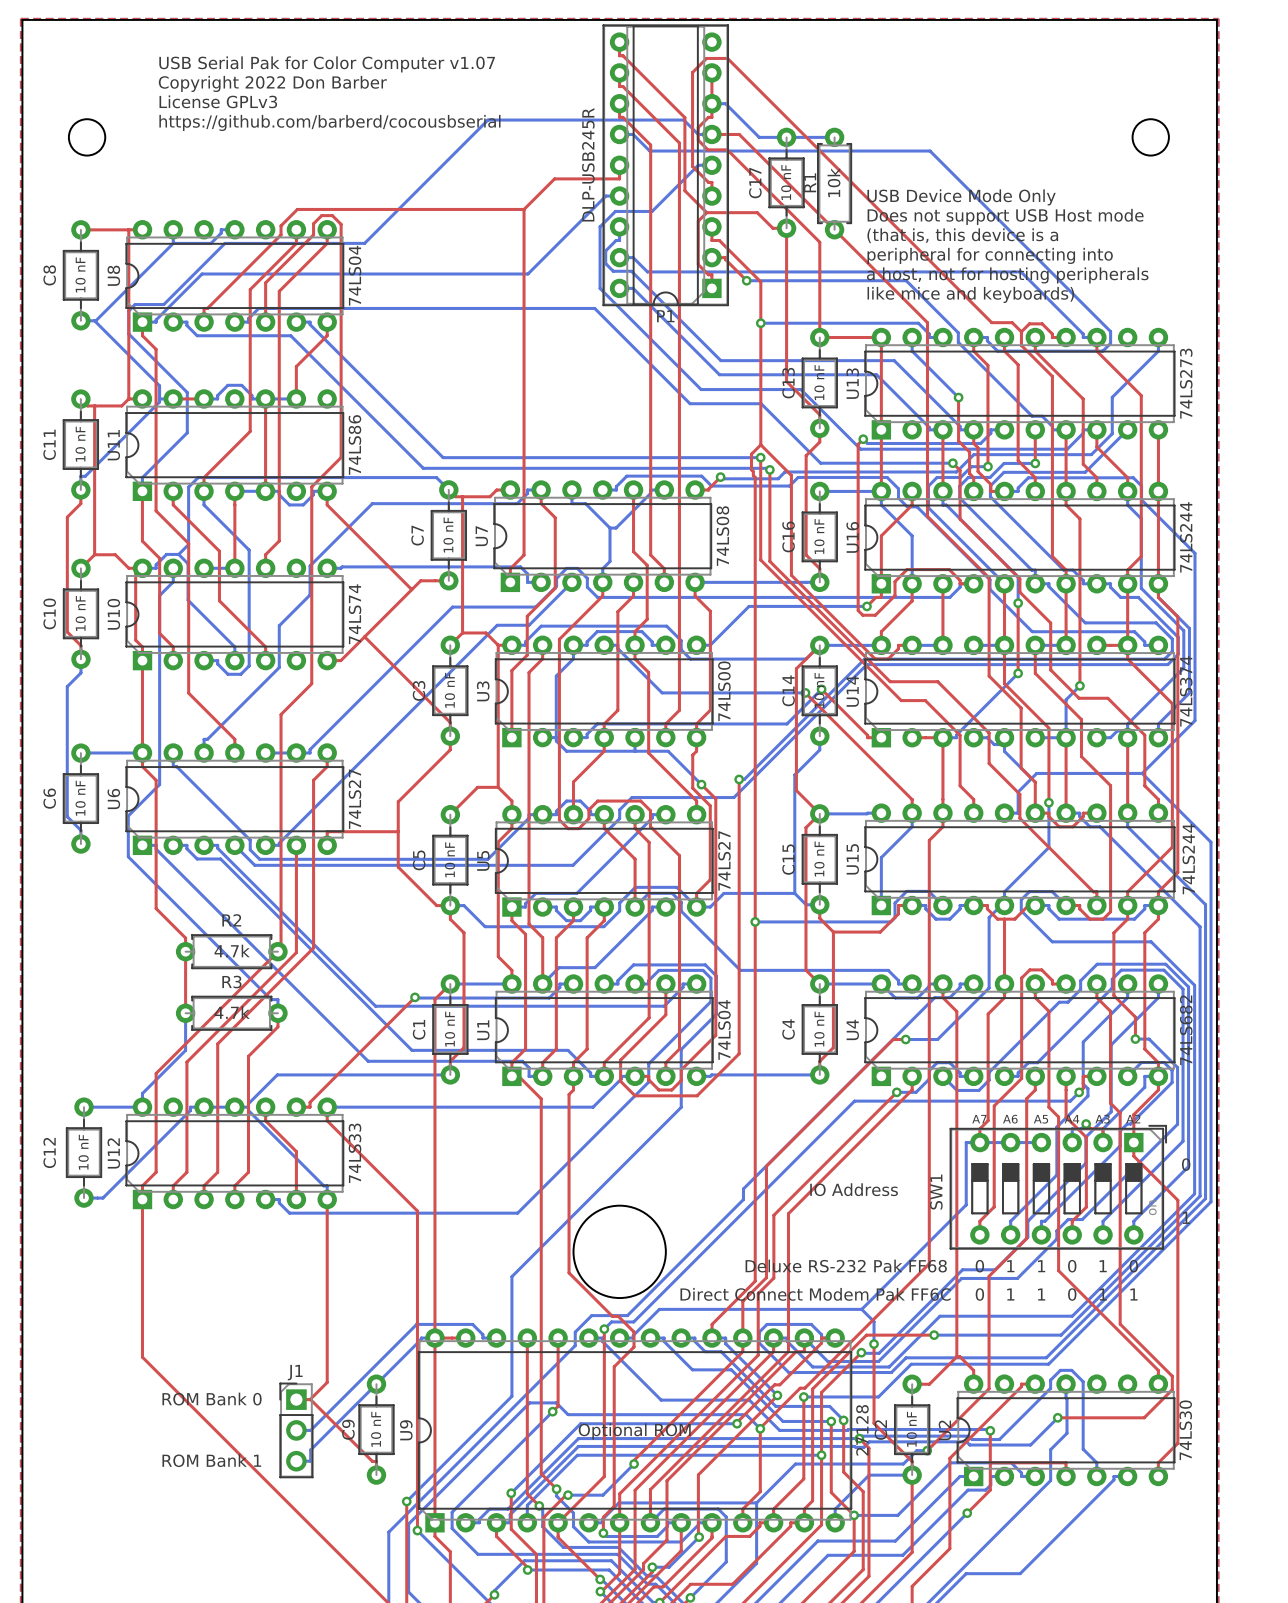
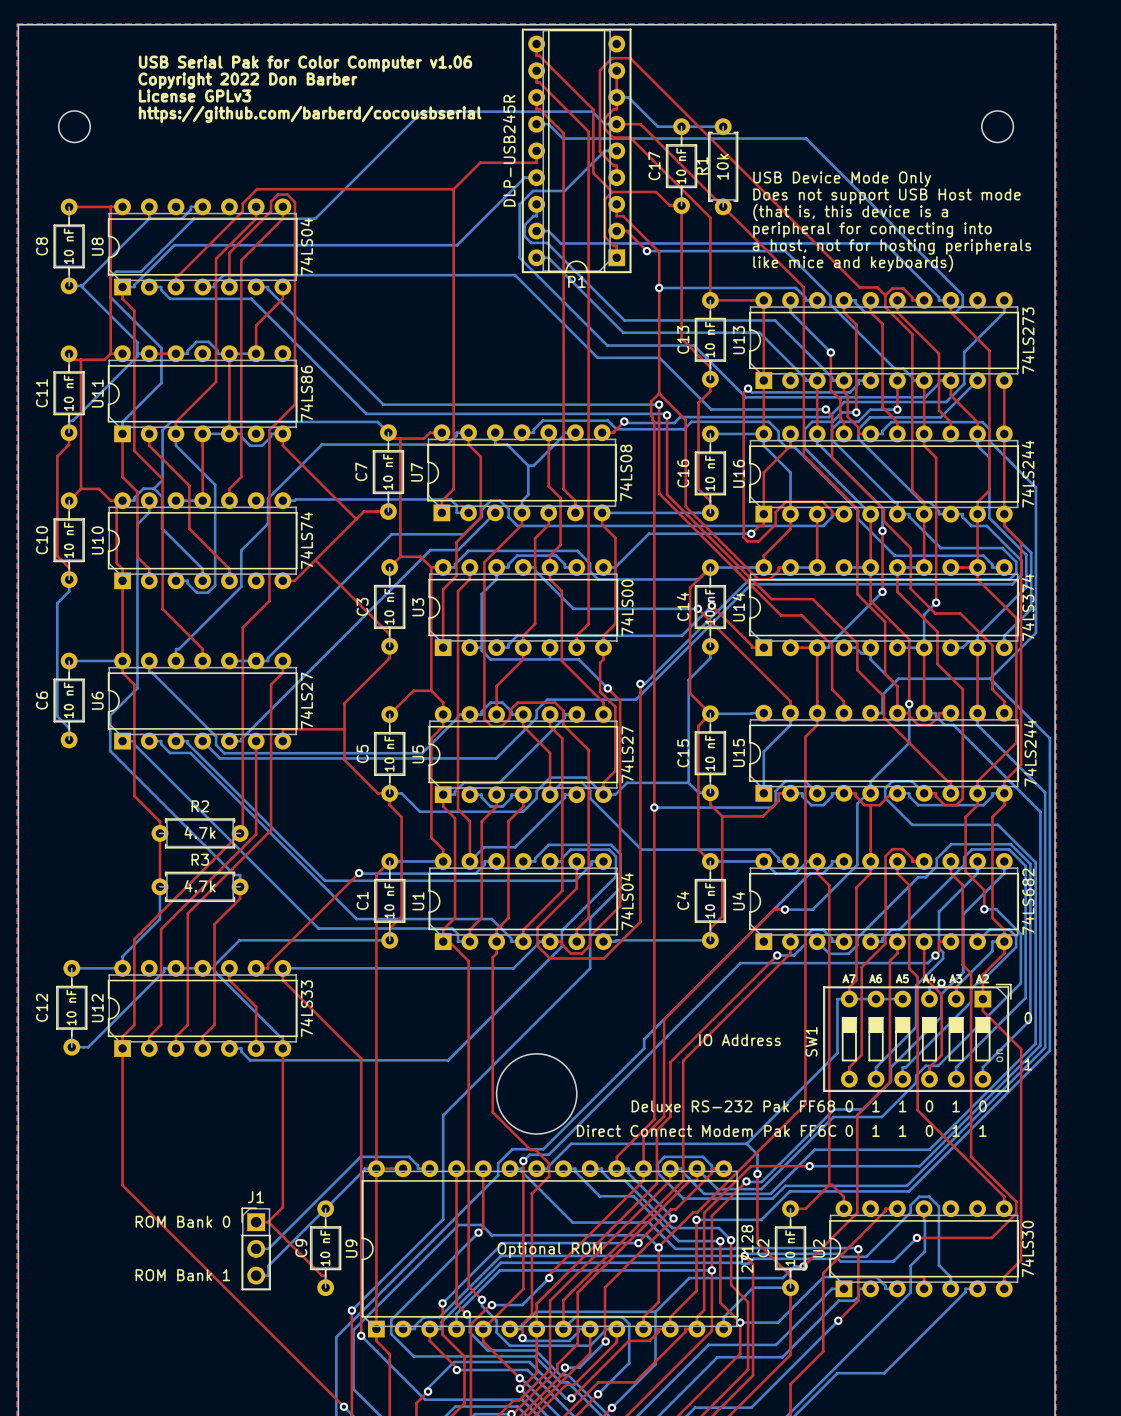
text: USB Serial Pak for Color Computer v1.07 (327, 64) -> USB Serial Pak for Color Computer v1.06 (305, 63)

